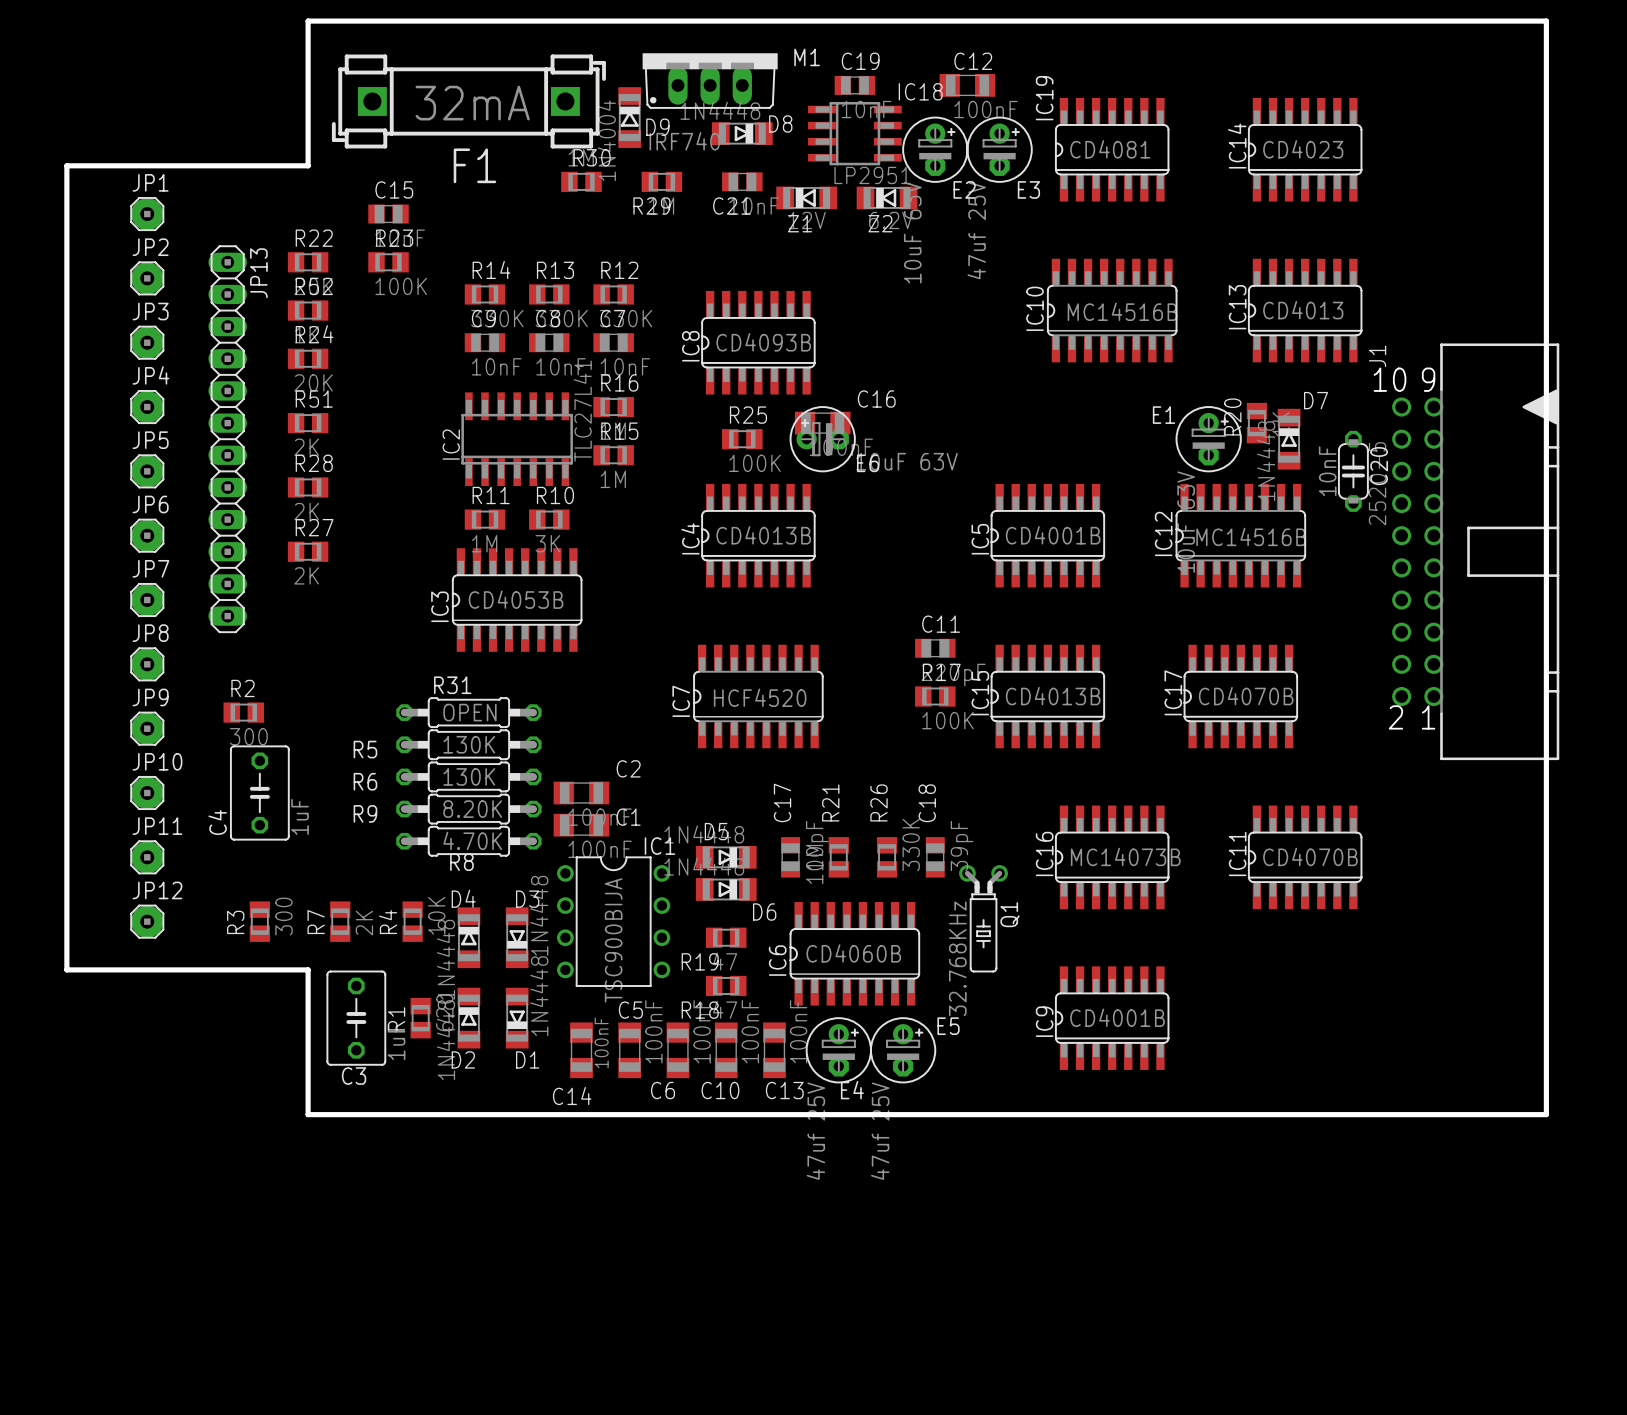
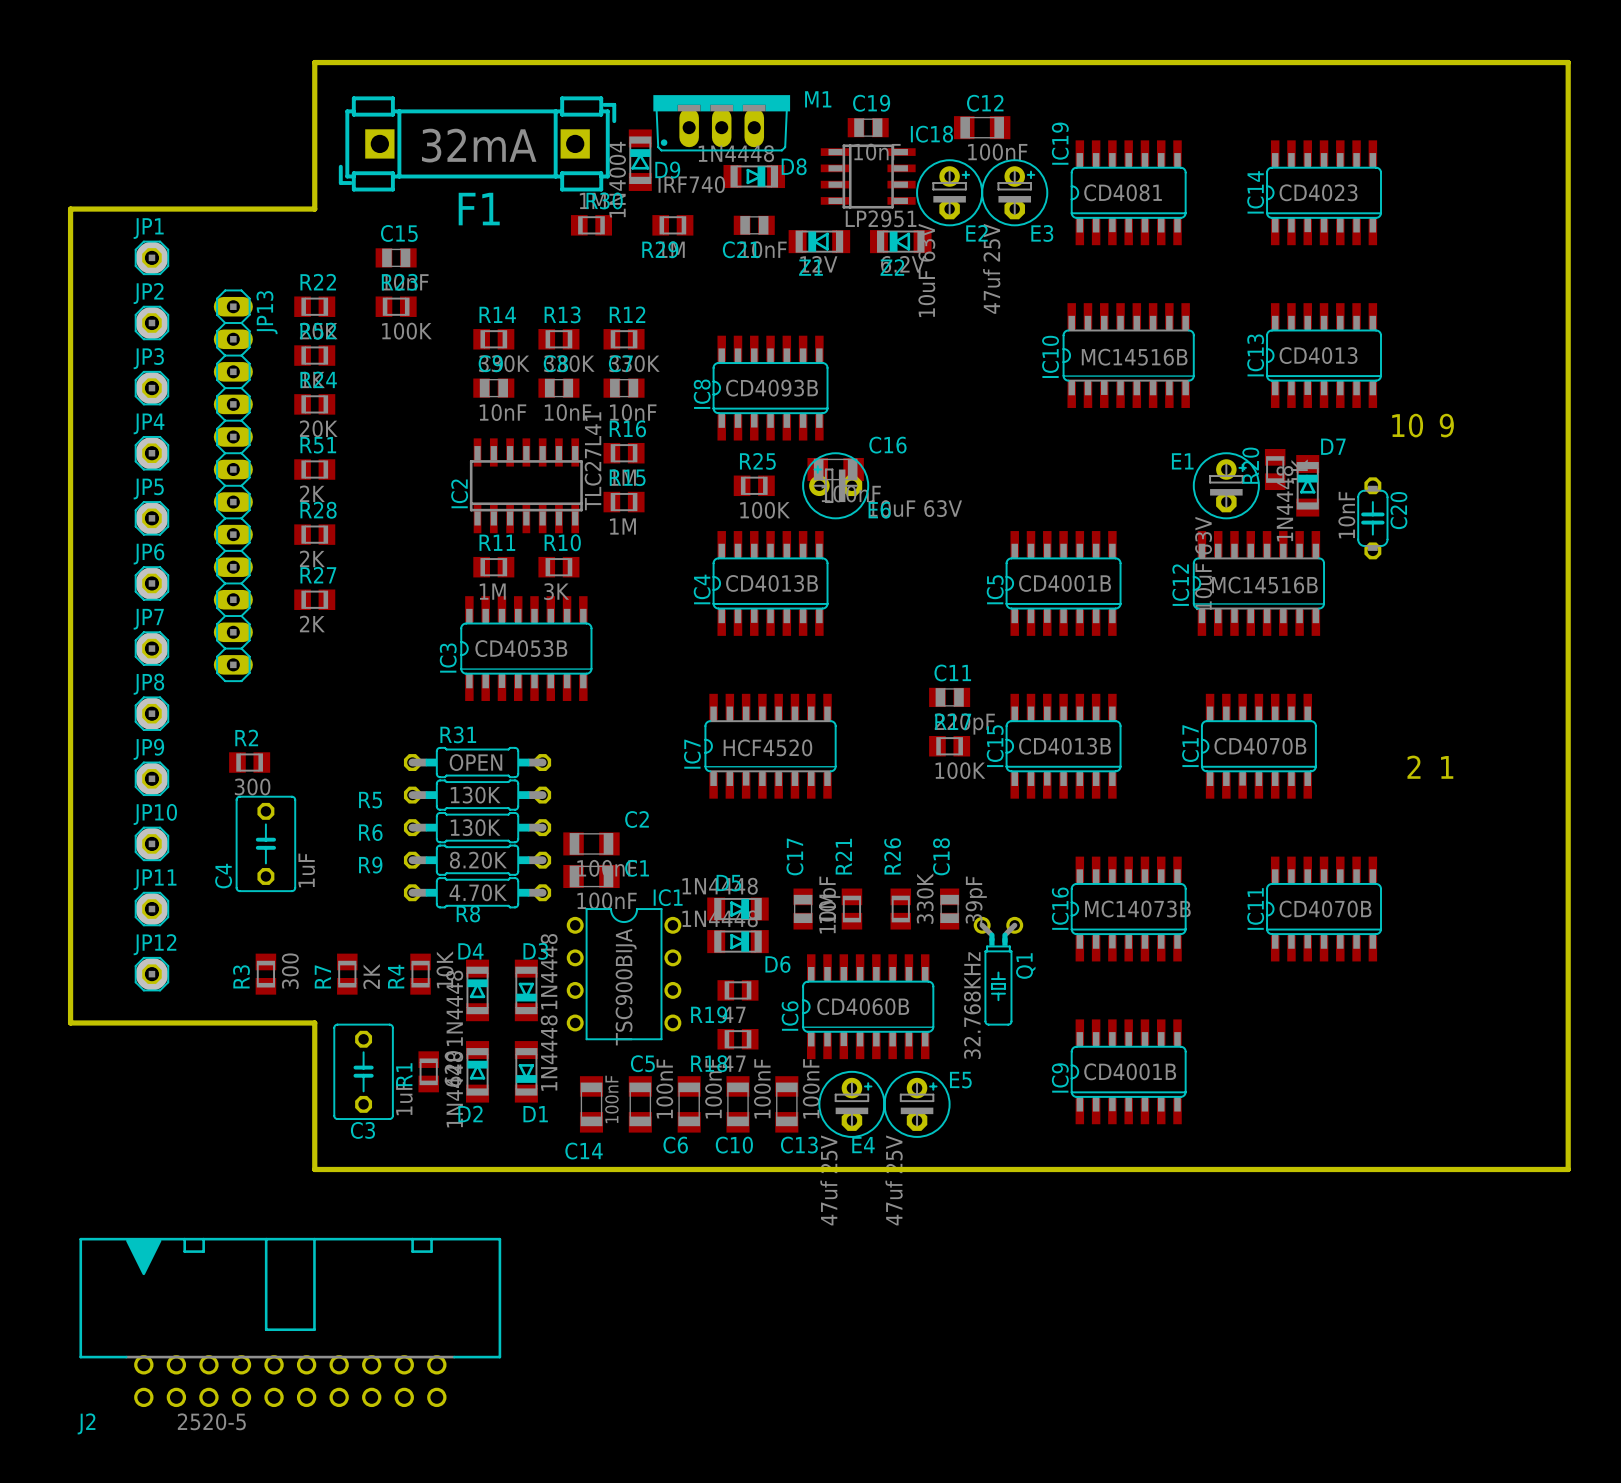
J1: 2520-5 (1475, 551) -> none
J2: none -> 2520-5 (290, 1322)

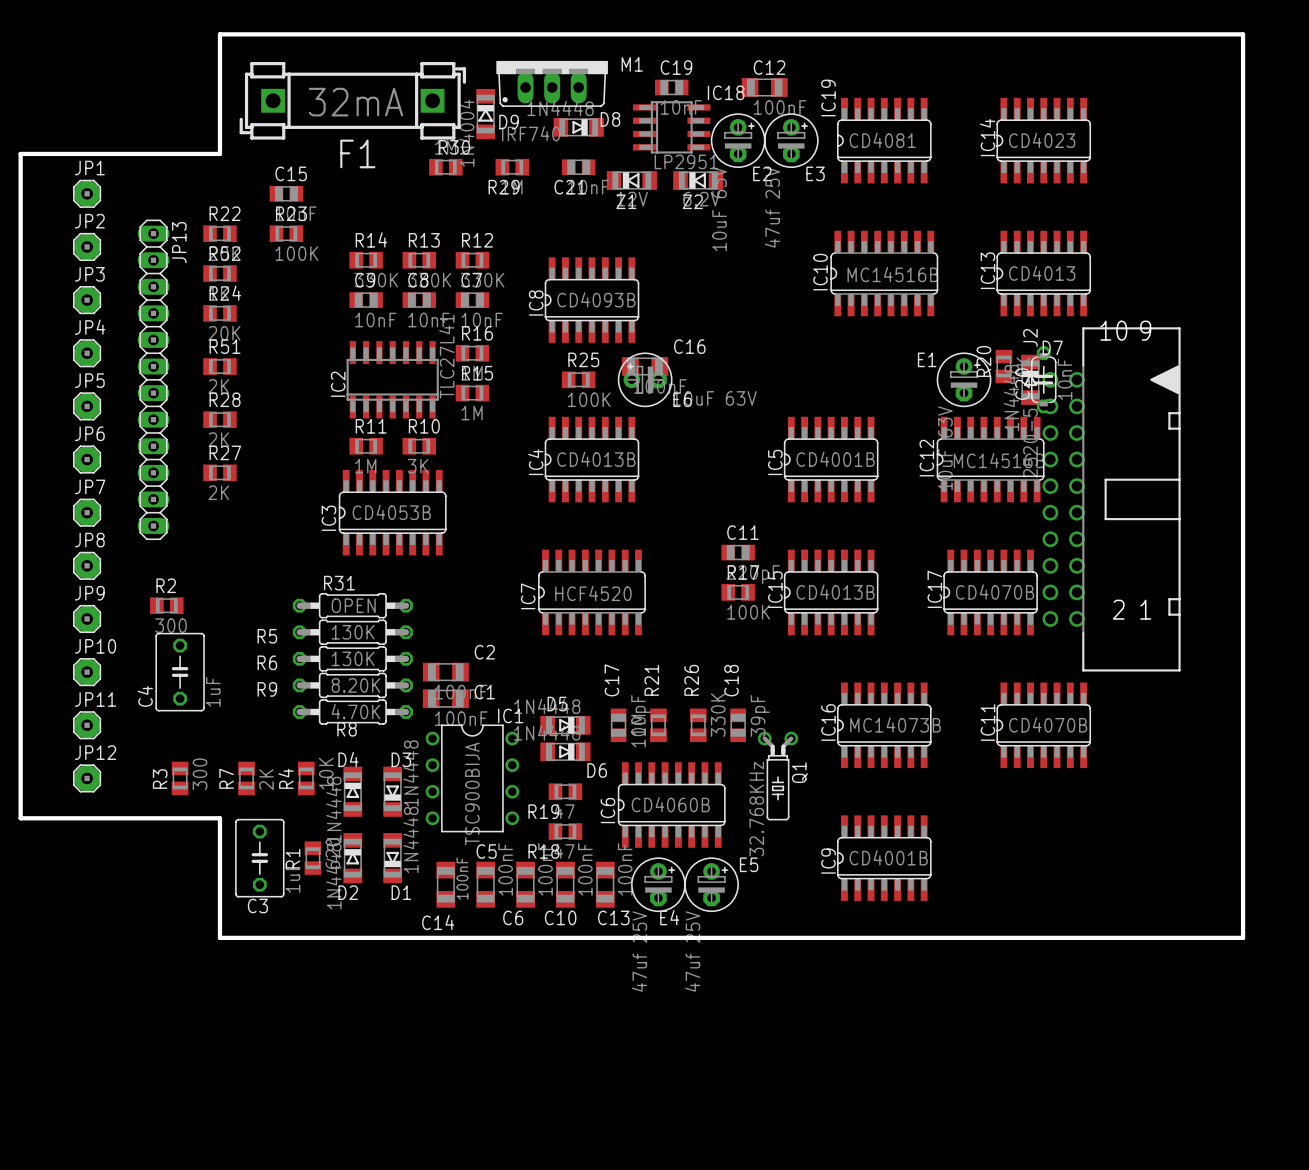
C20 rotation: 0° (1372, 518) -> 180° (1043, 379)
C20 position: (1372, 518) -> (1043, 379)
J2 rotation: 0° (290, 1322) -> 90° clockwise (1111, 499)
J2 position: (290, 1322) -> (1111, 499)

